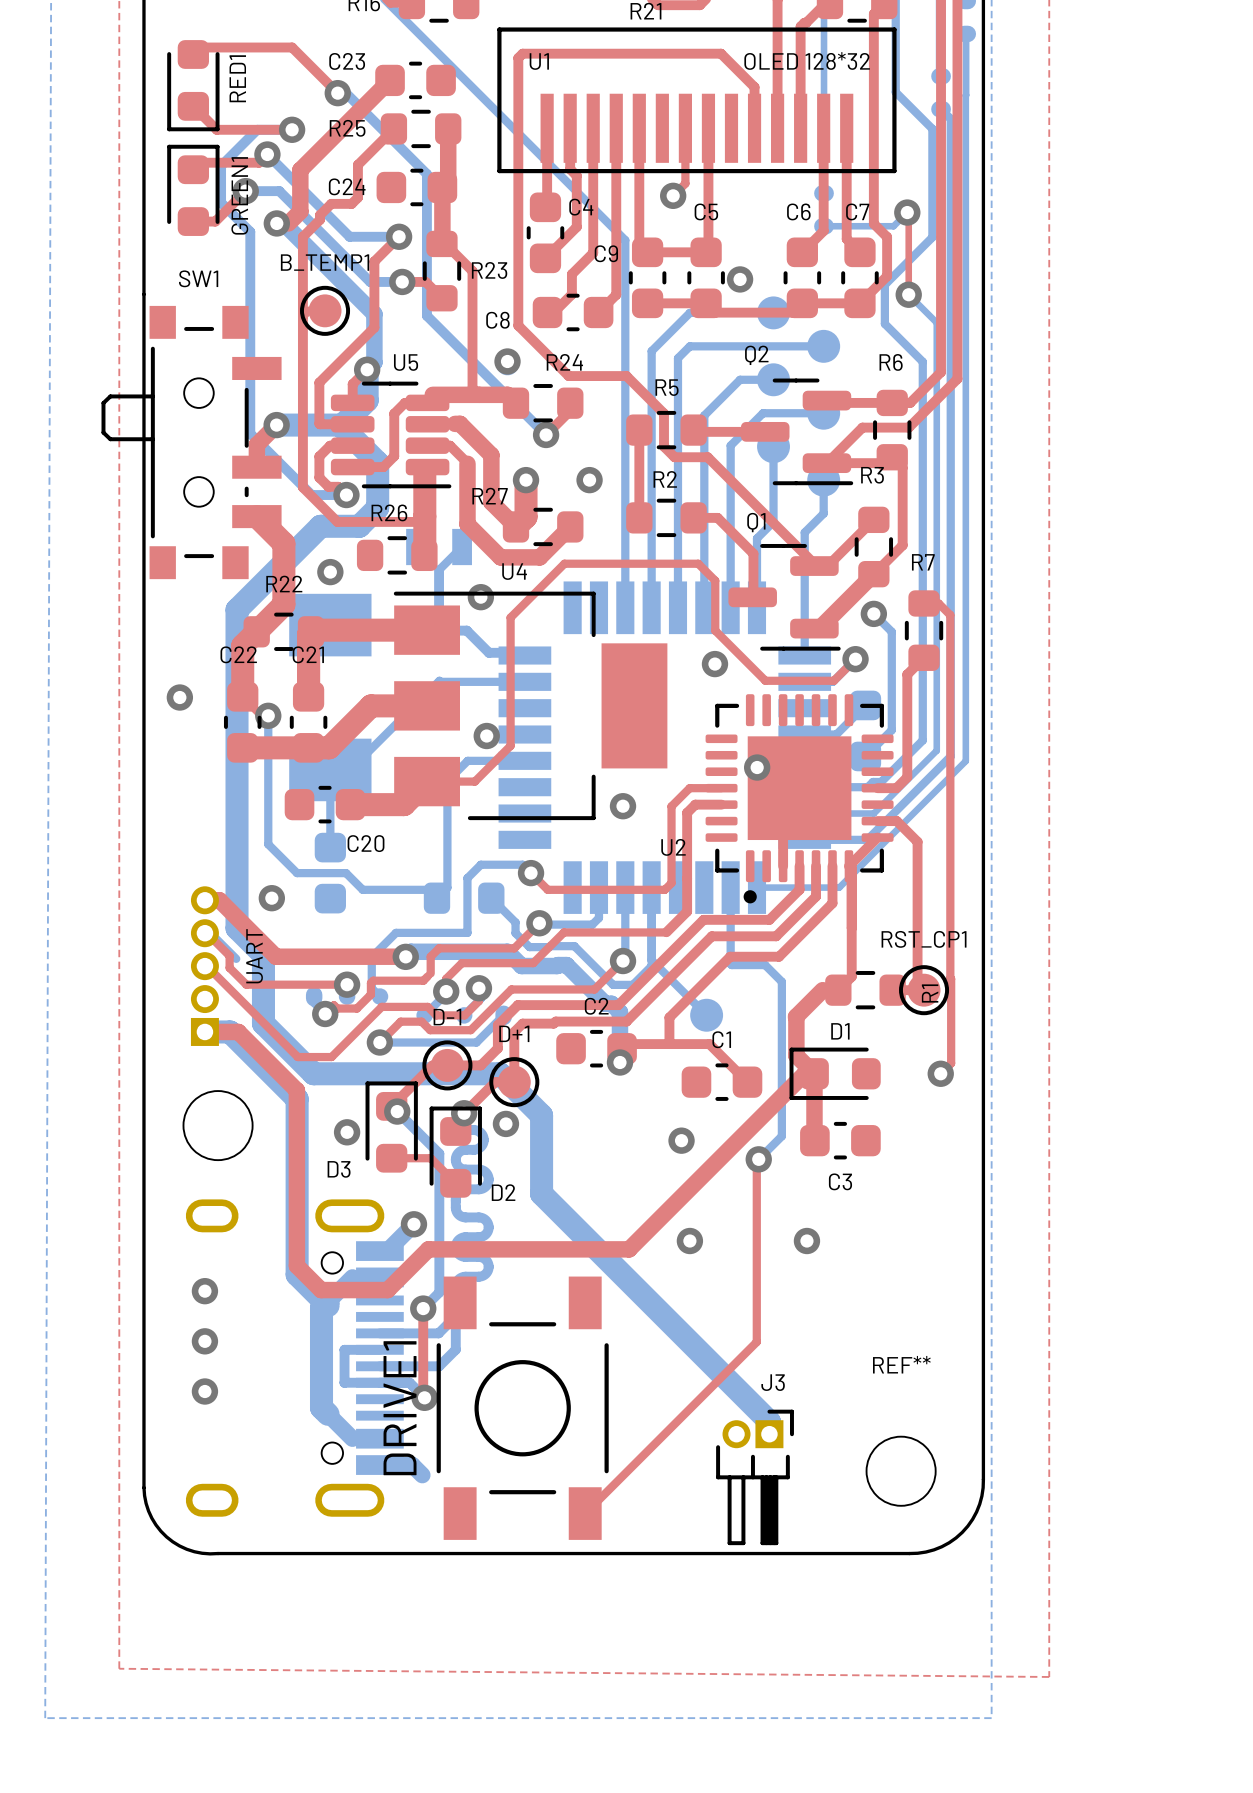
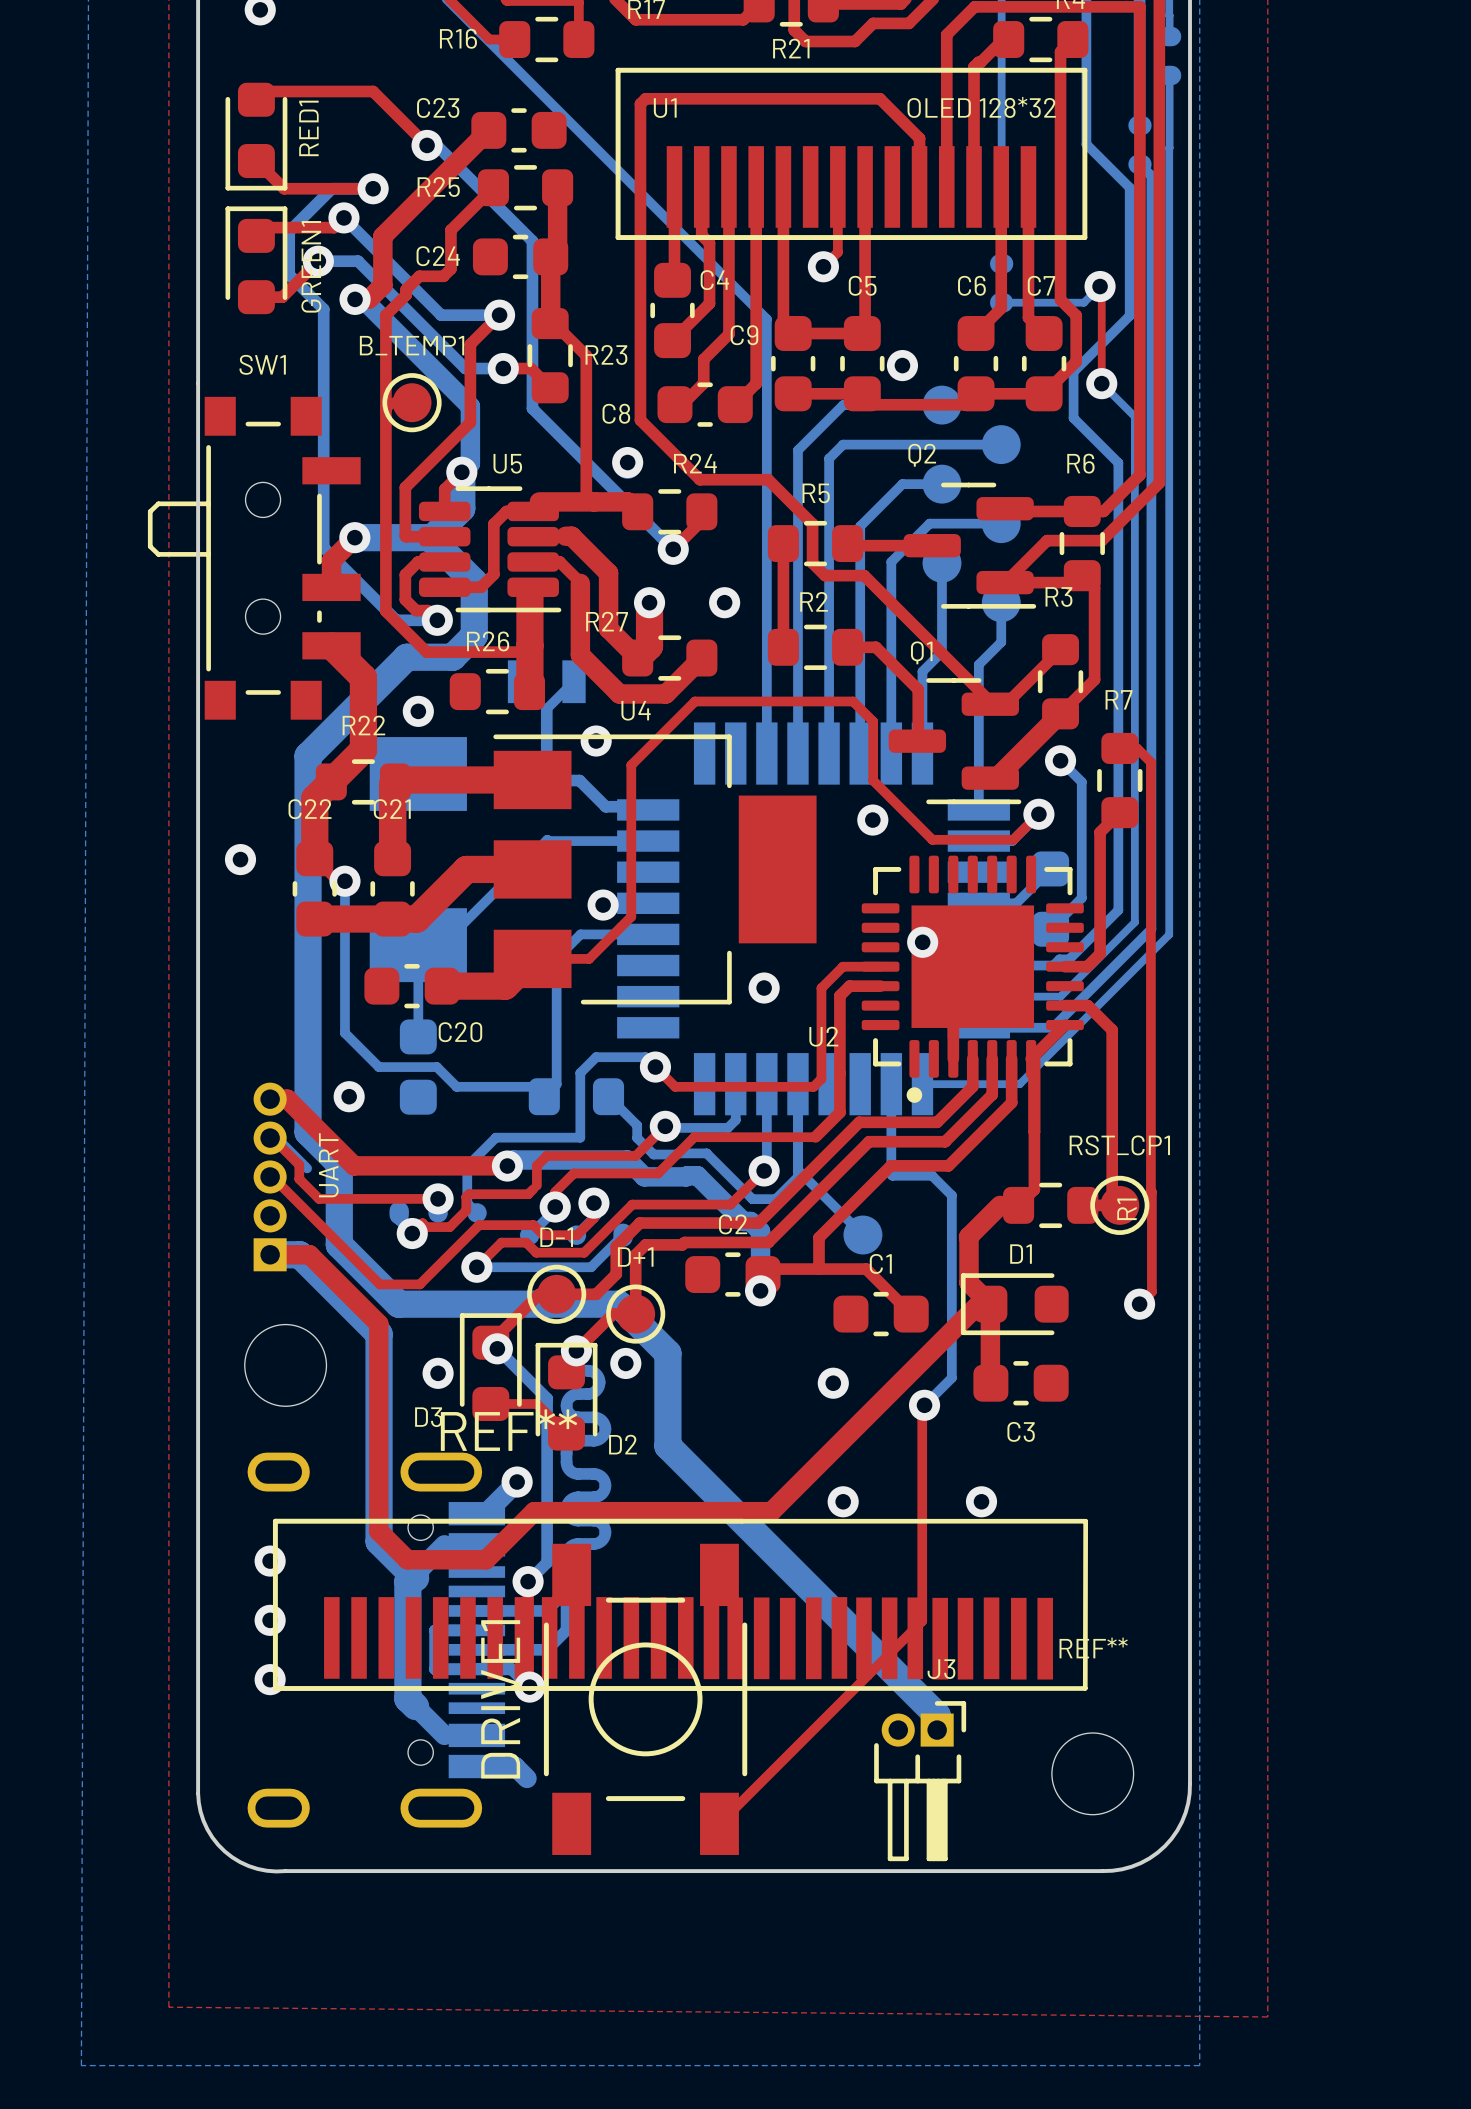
REF**: none -> (680, 1604)

